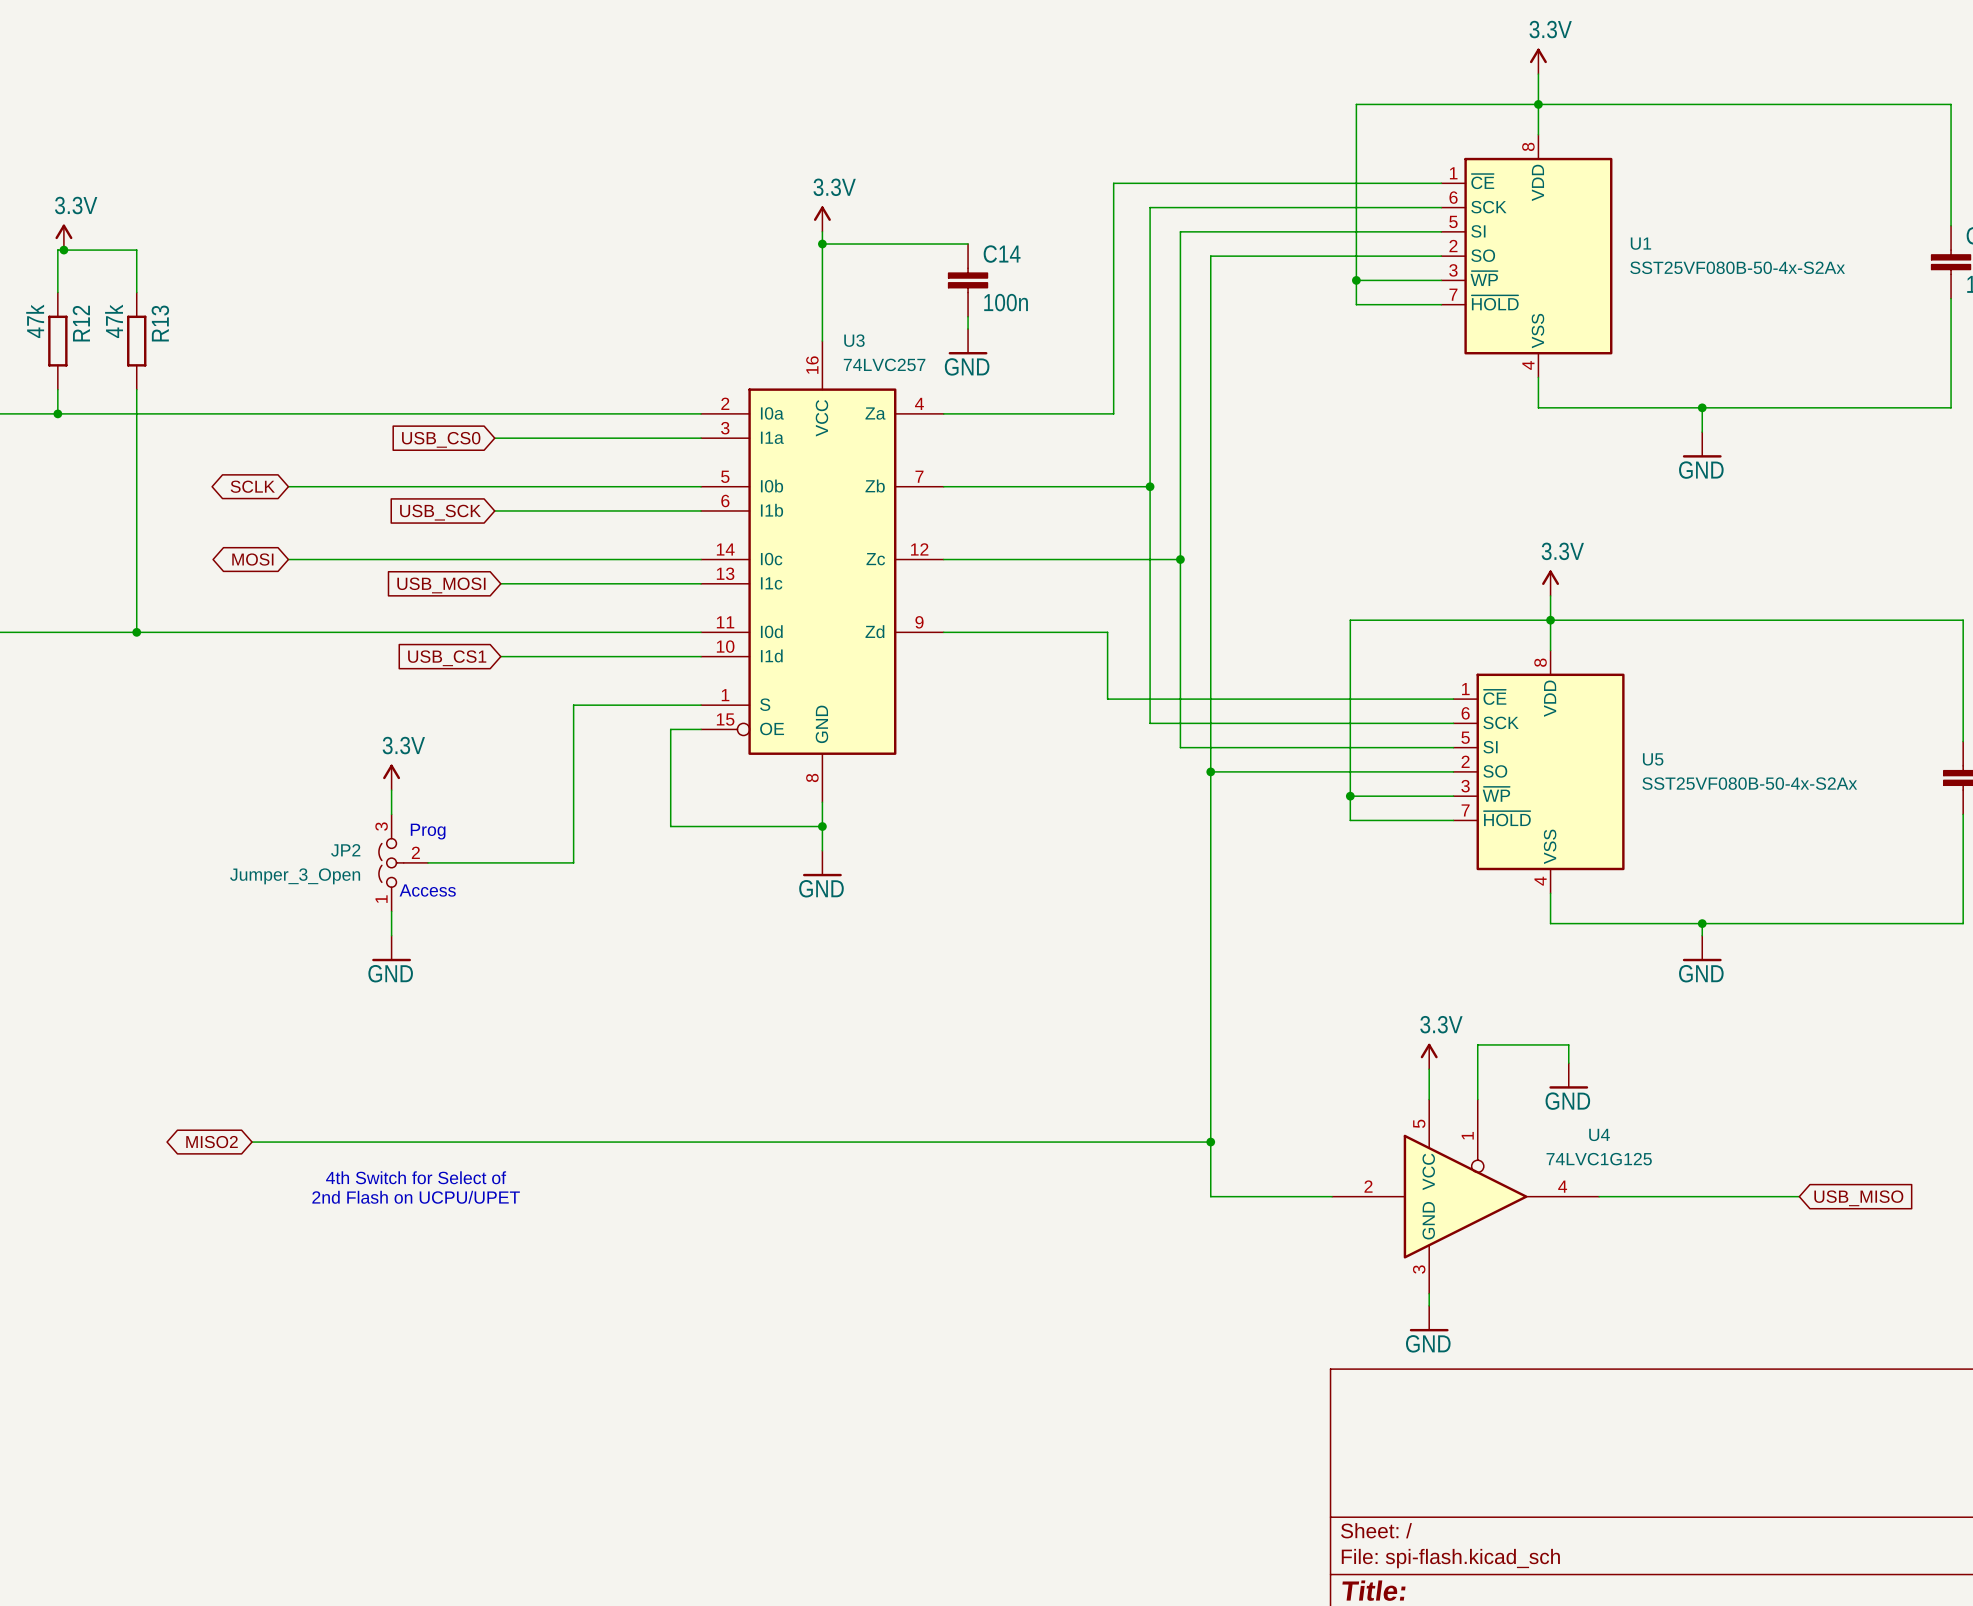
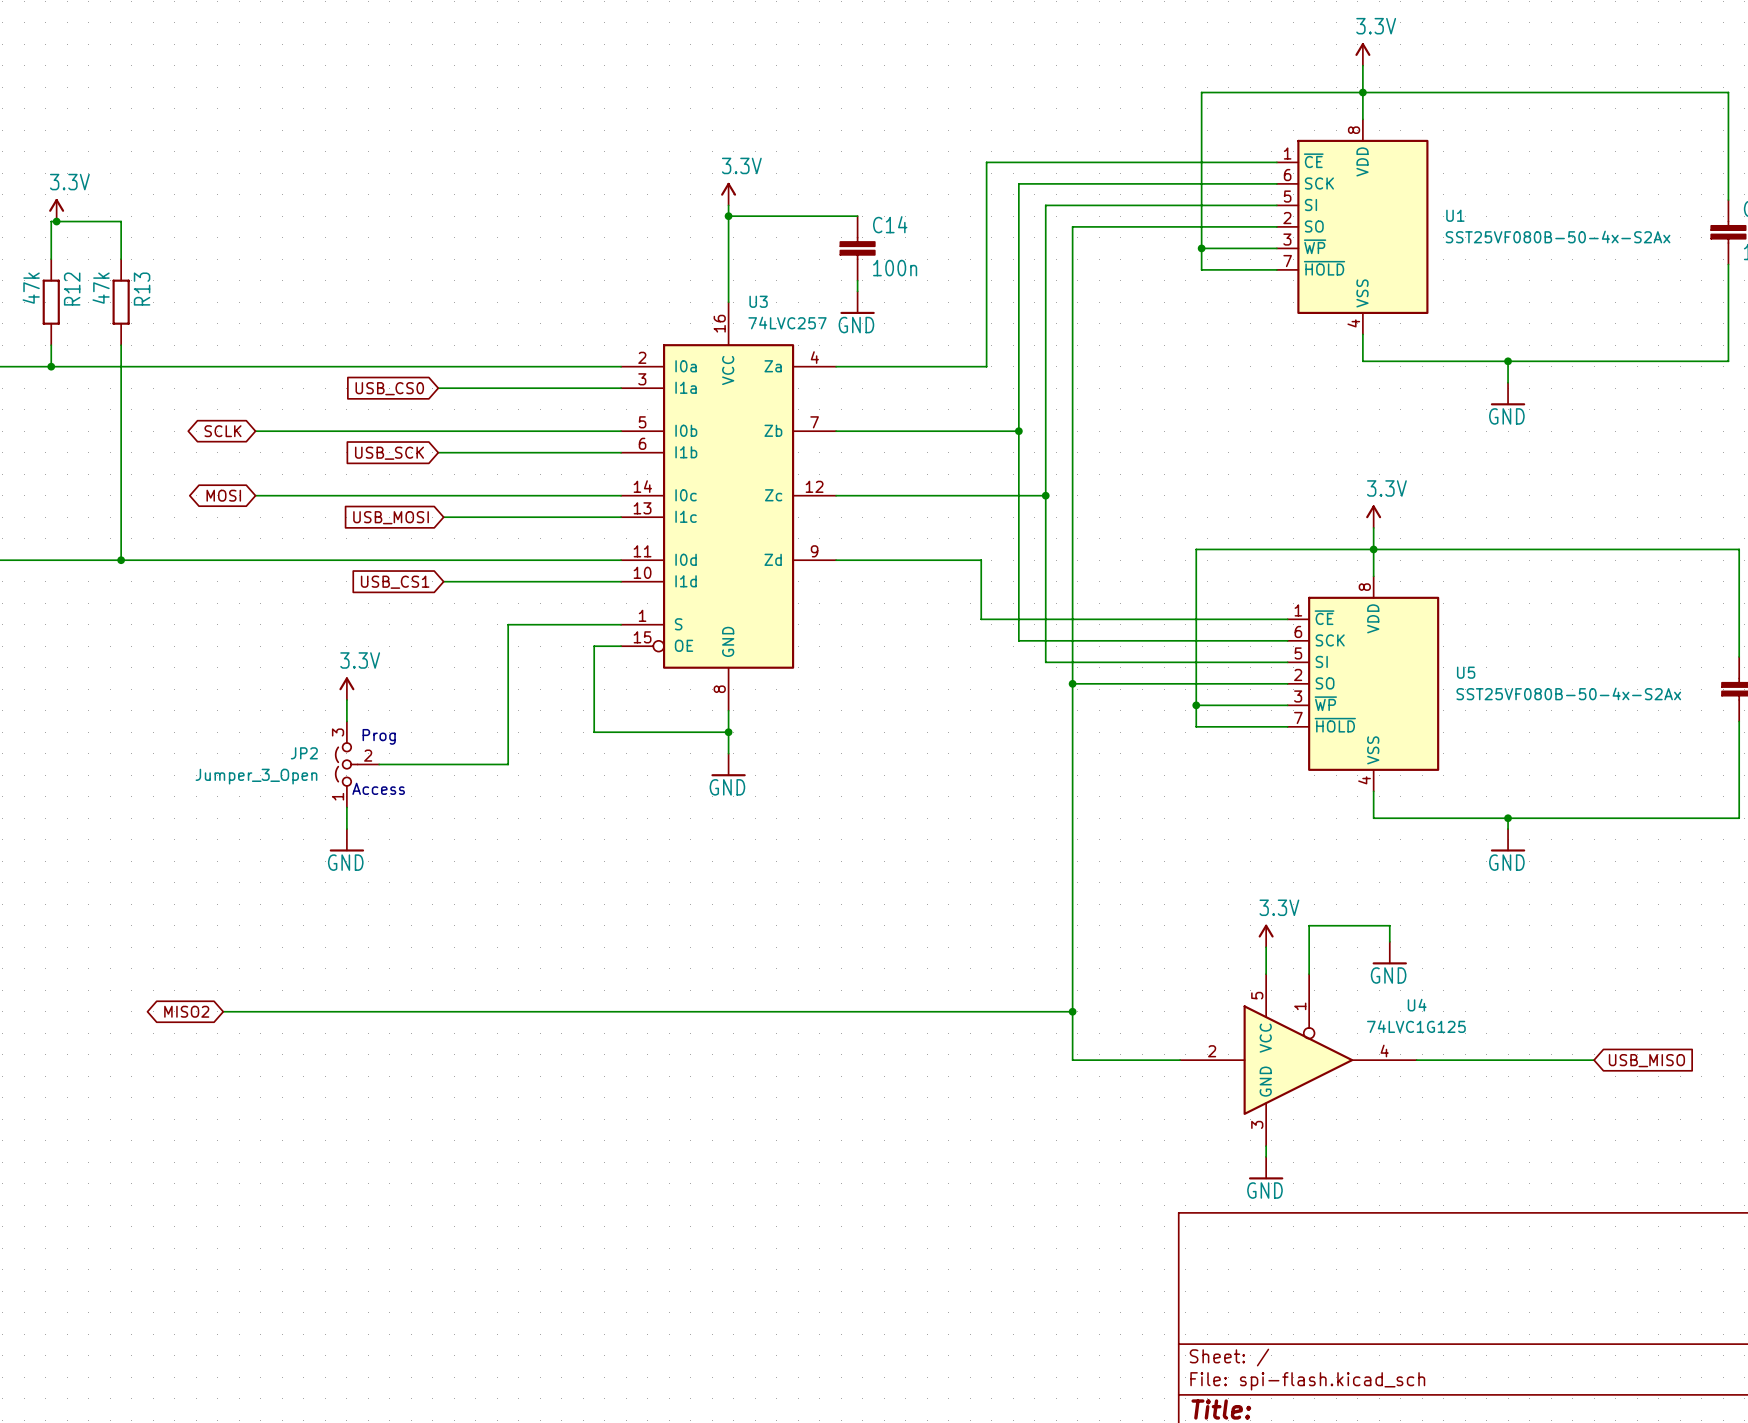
text: 4th Switch for Select of (416, 1177) -> none
text: 2nd Flash on UCPU/UPET (416, 1197) -> none

